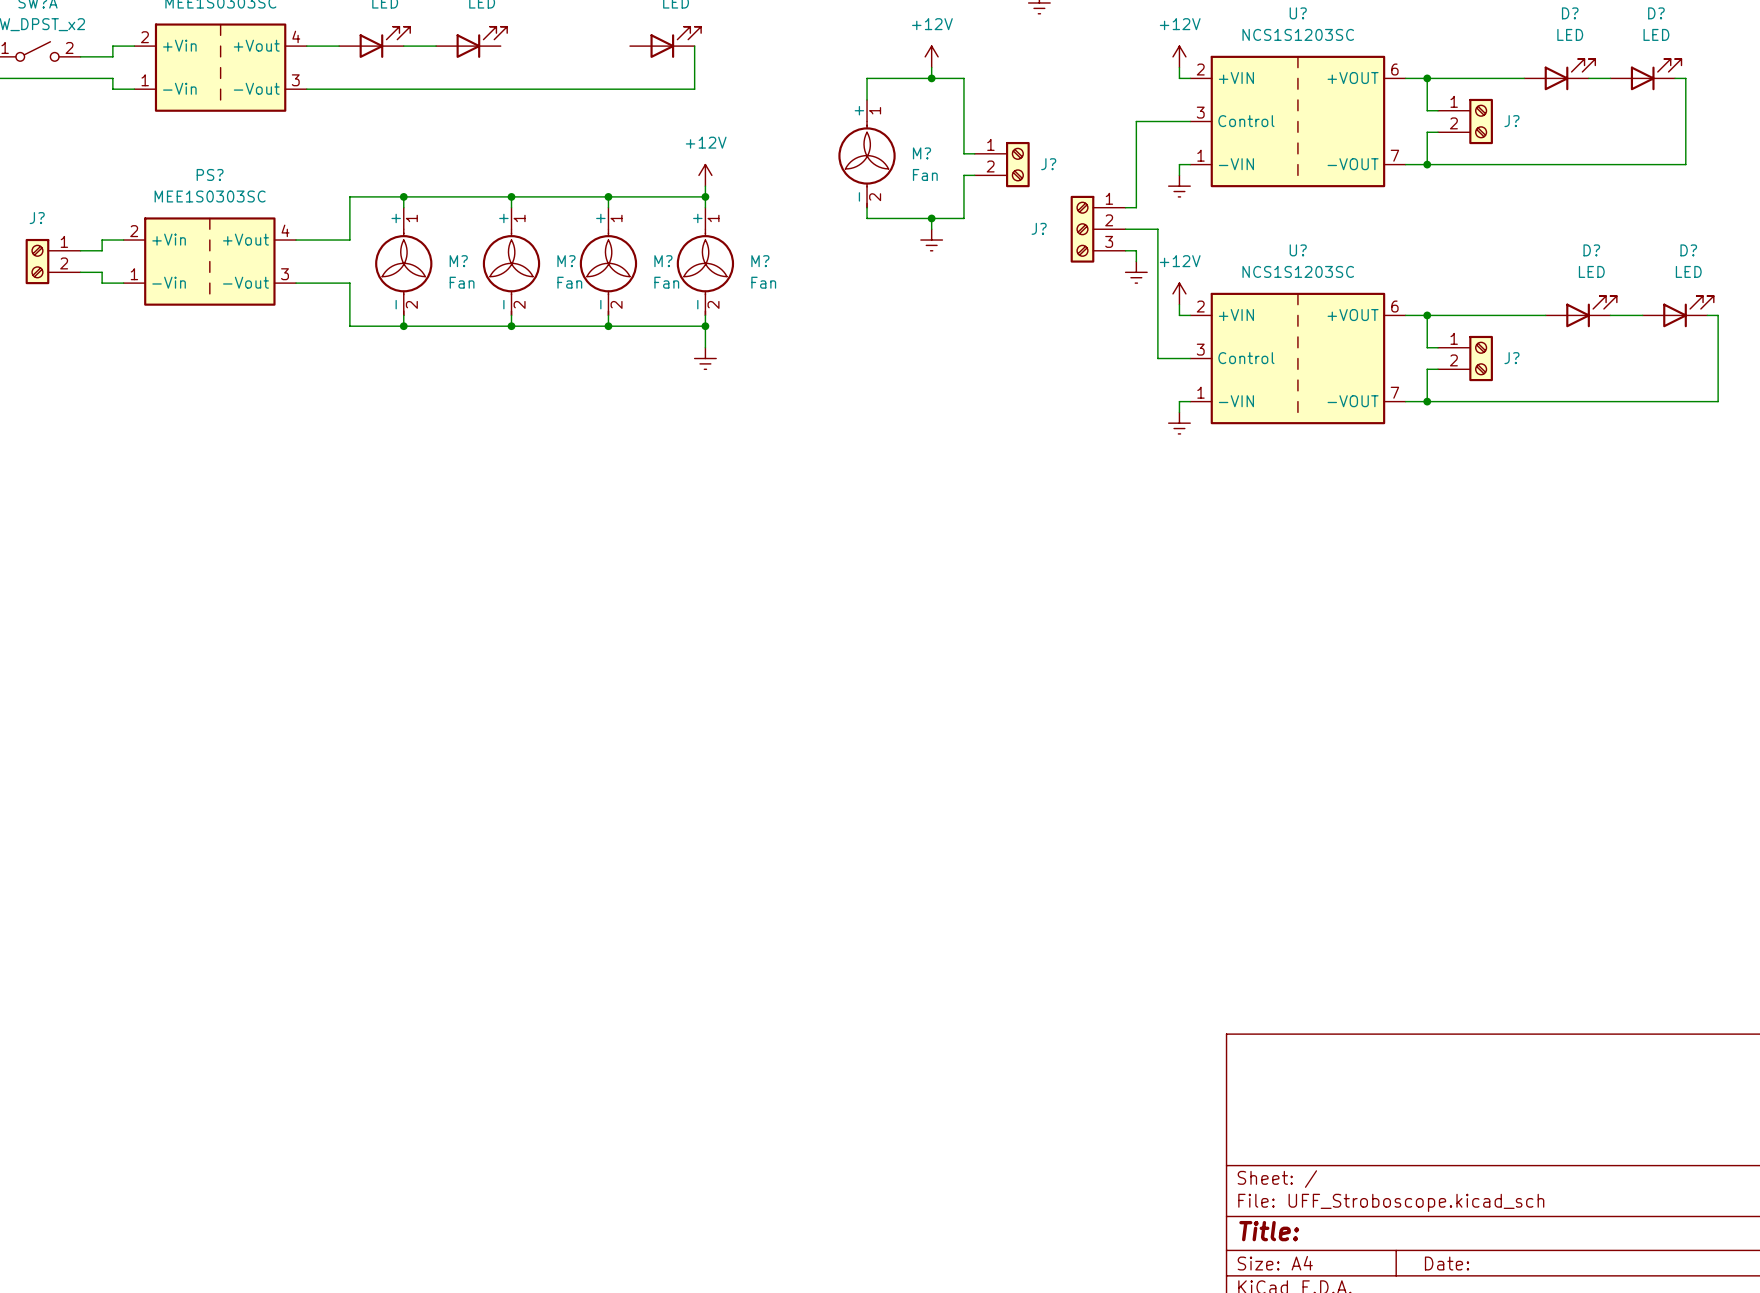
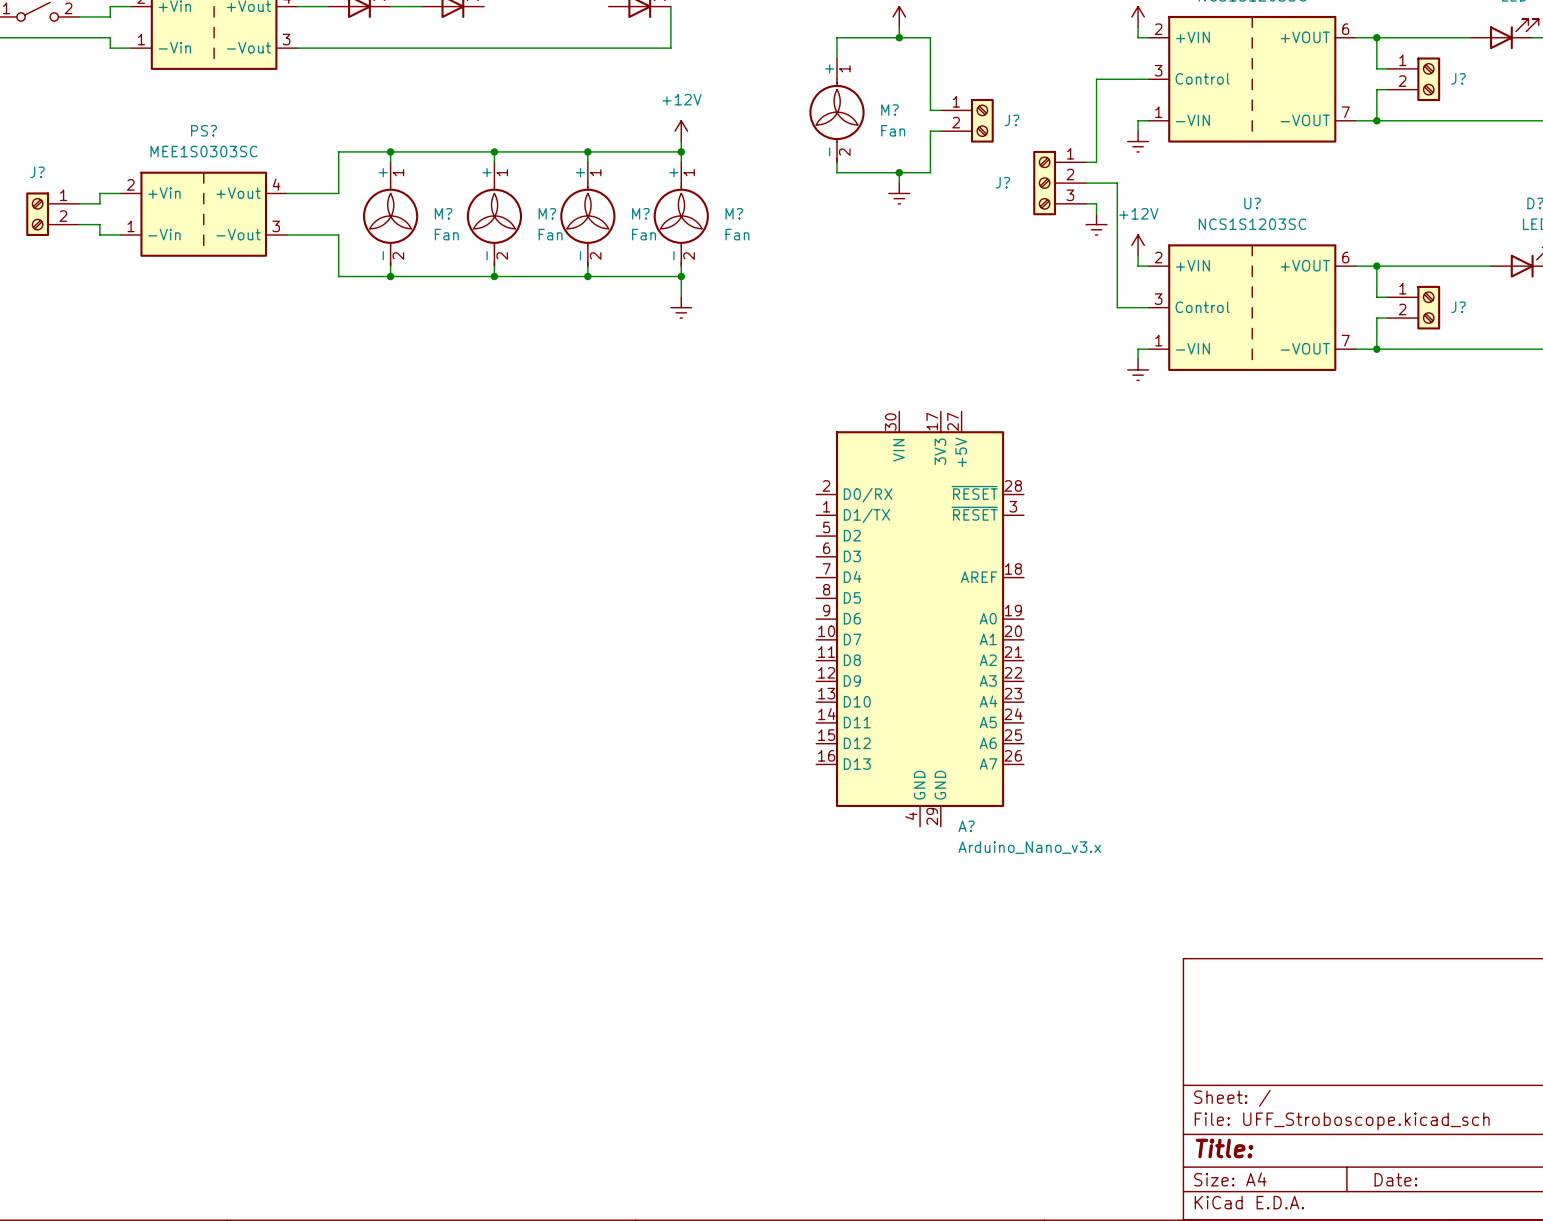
A?: none -> Arduino_Nano_v3.x (920, 619)

